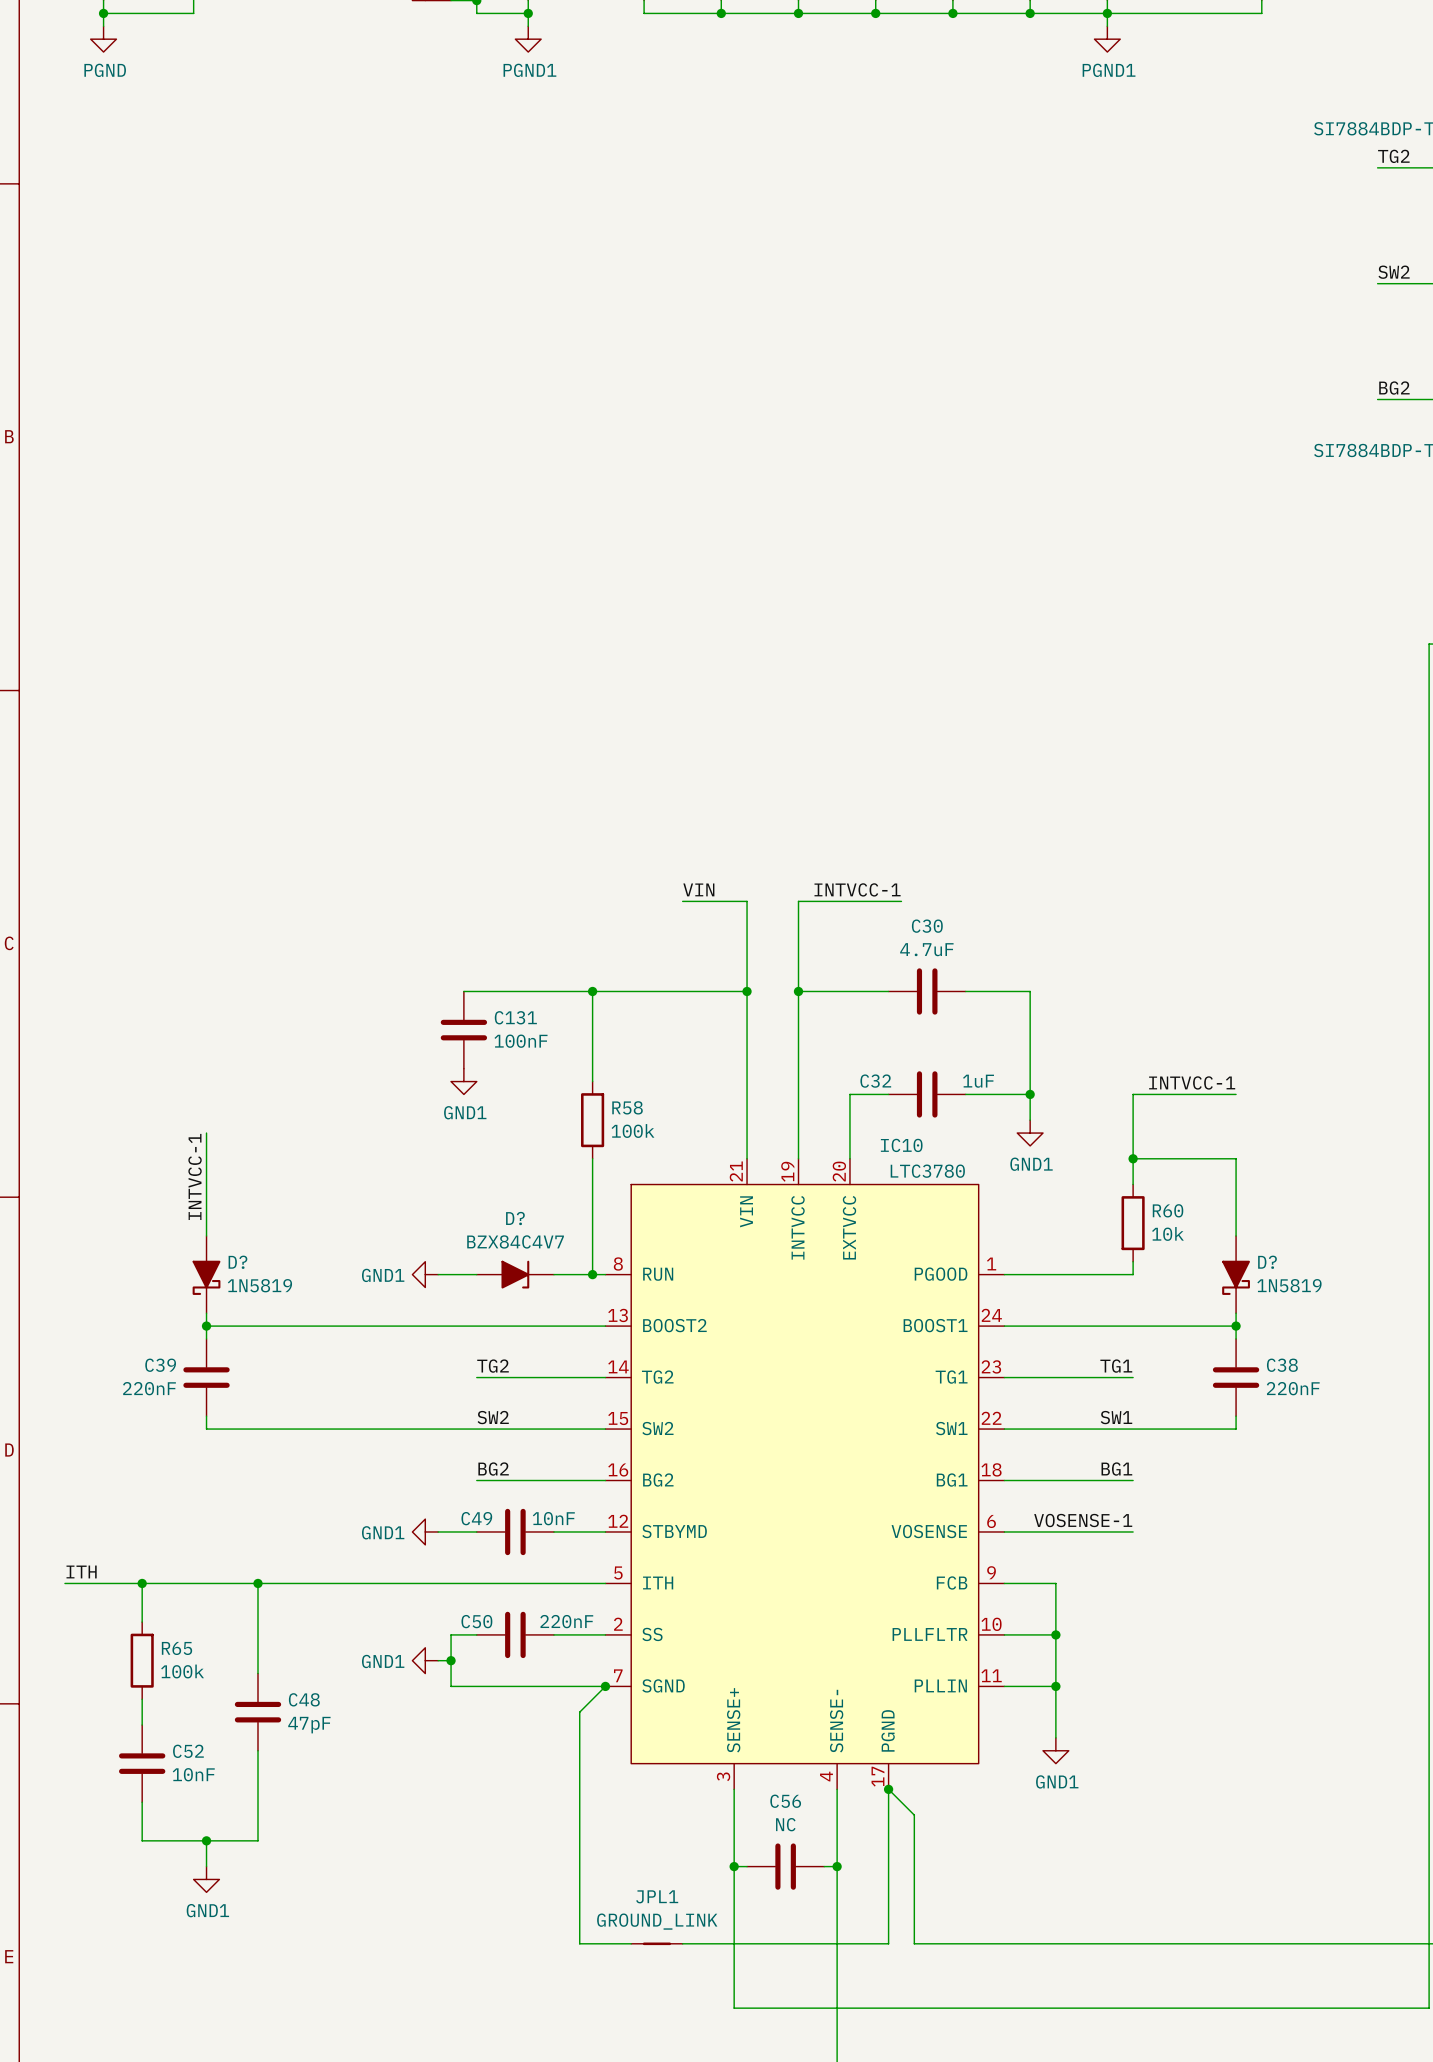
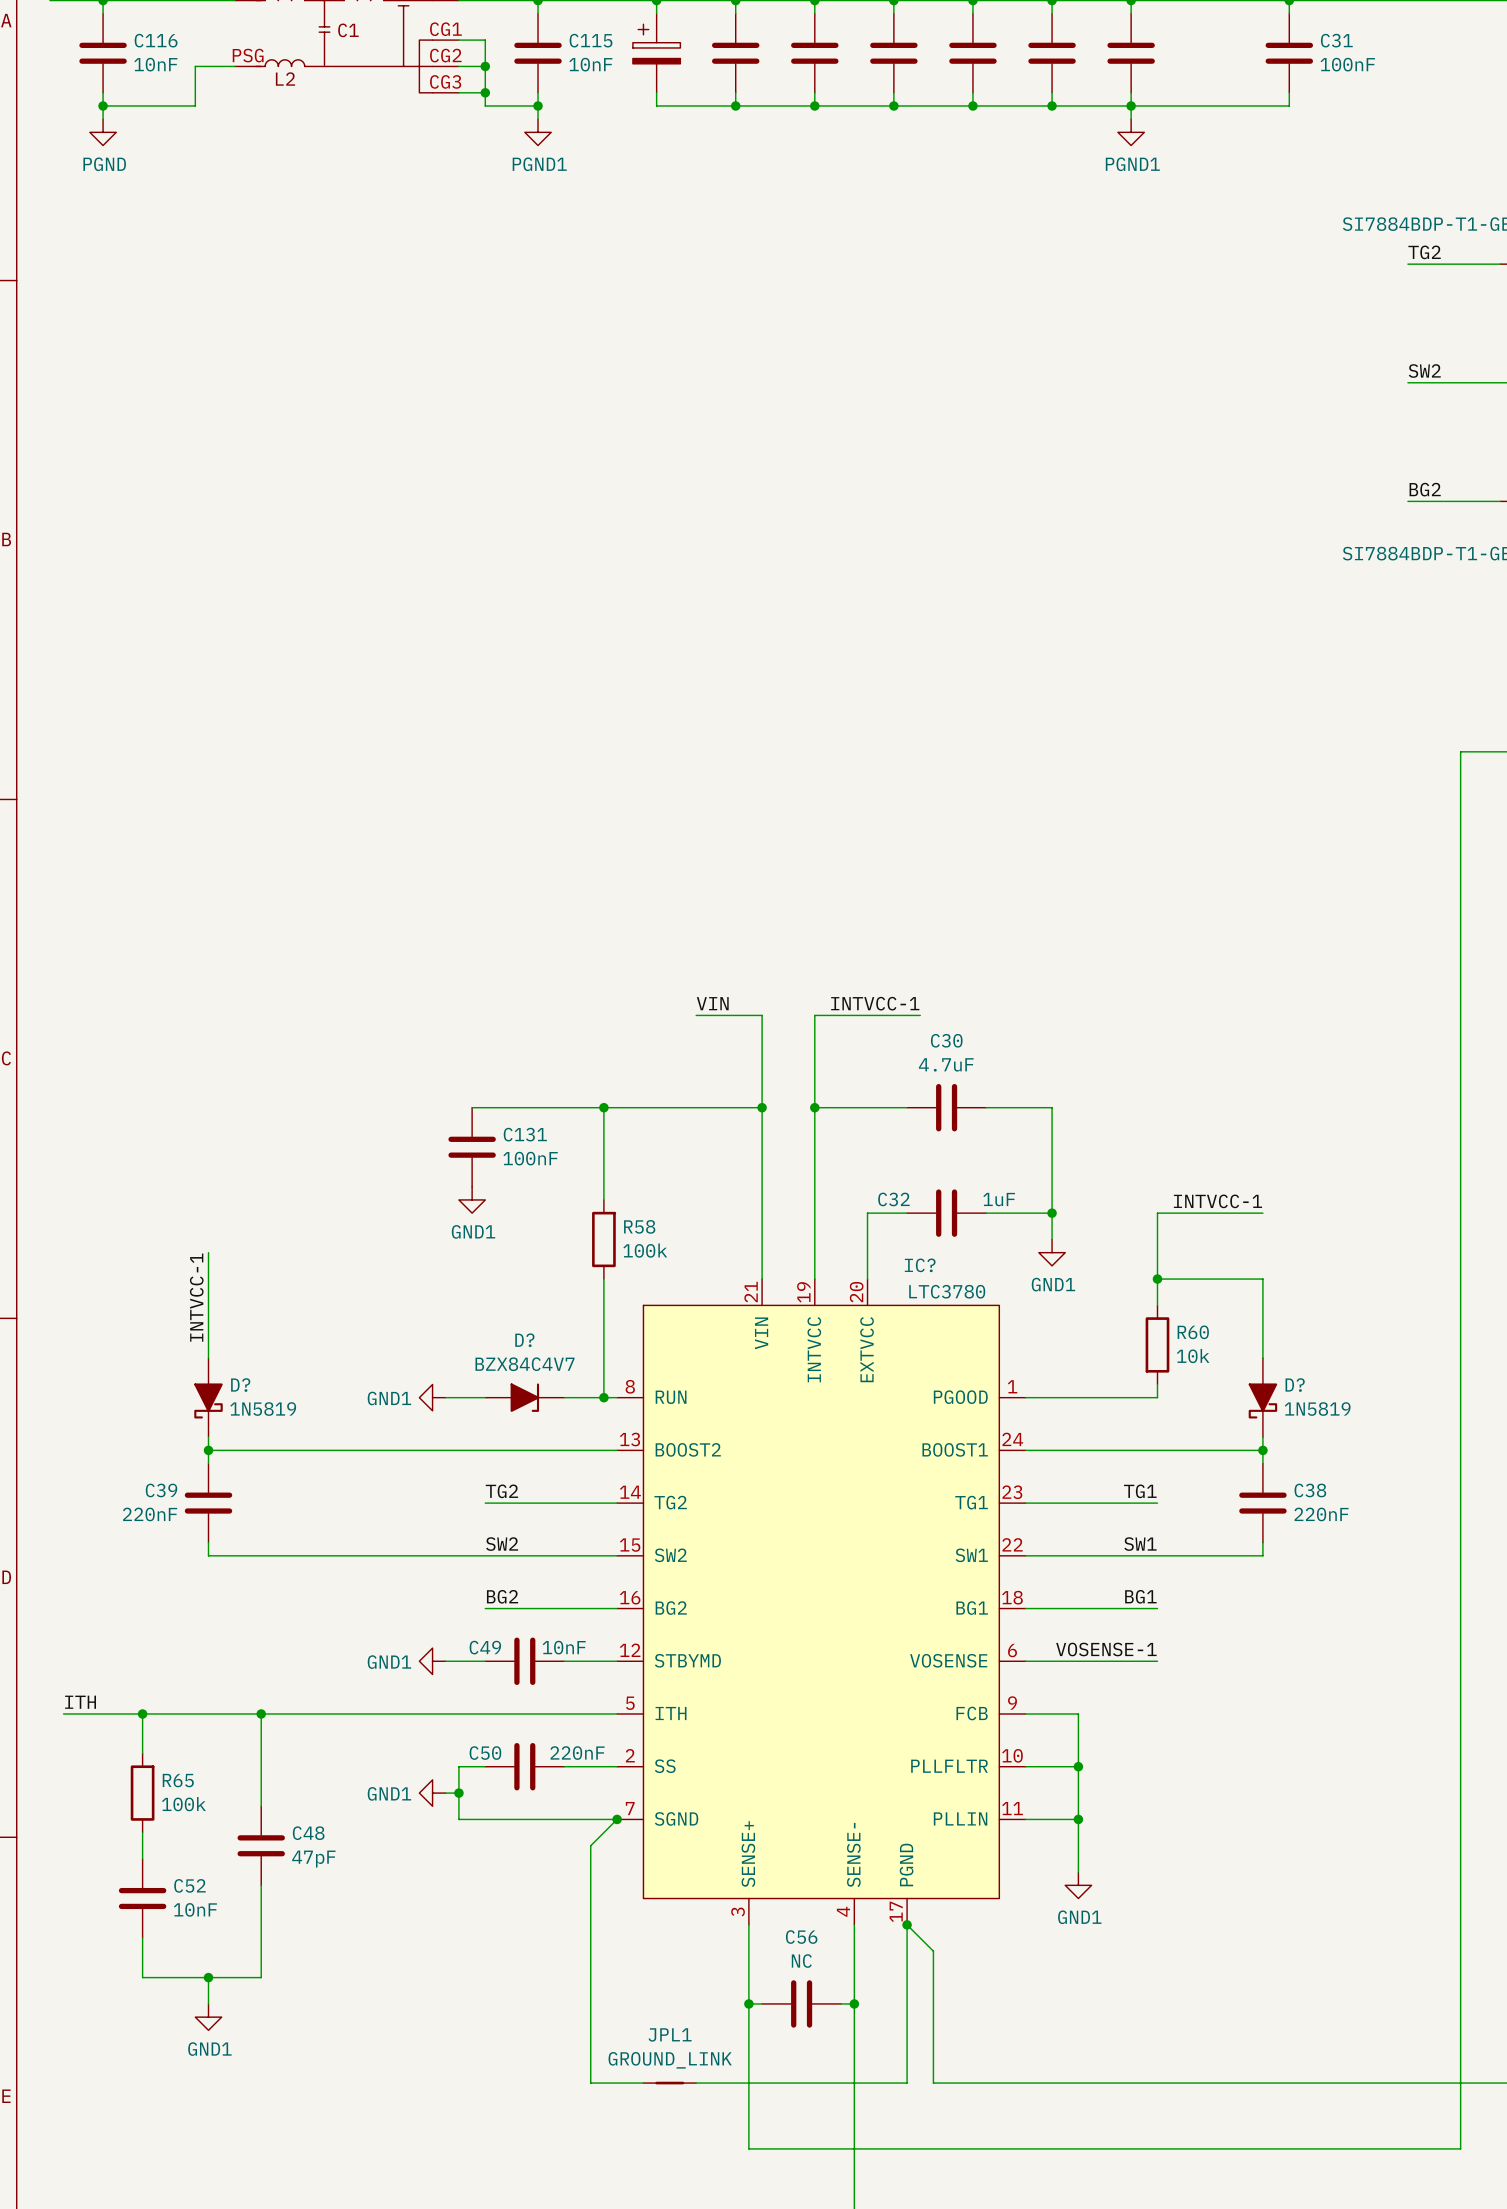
IC10 name: IC10 (901, 1145) -> IC? (920, 1265)

